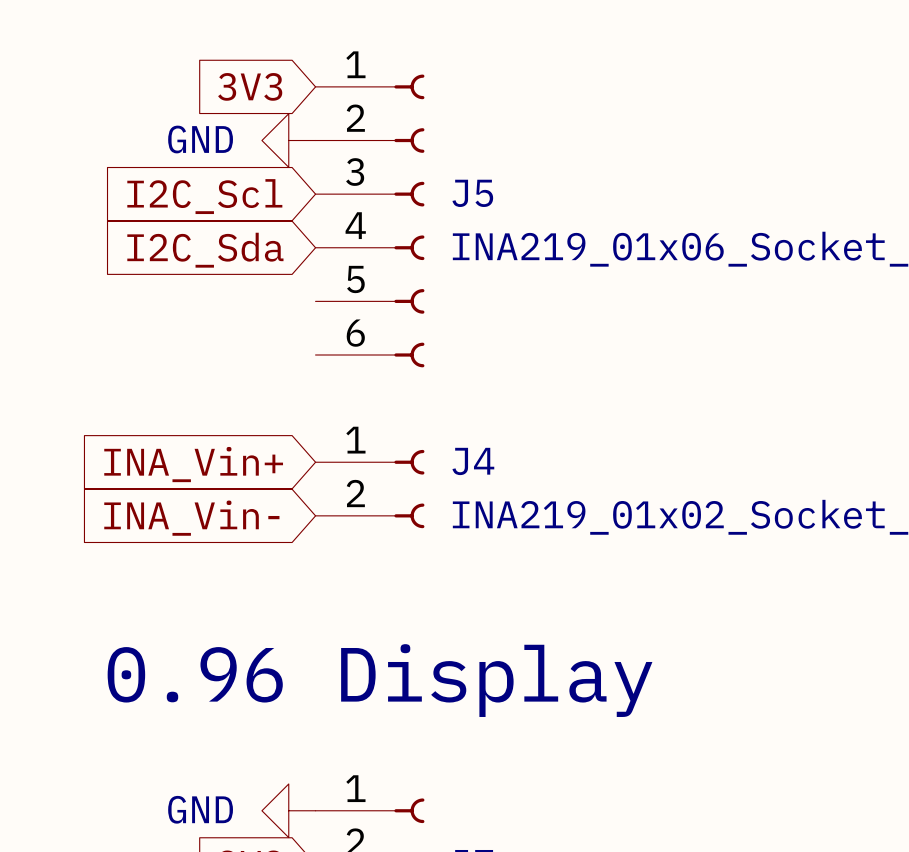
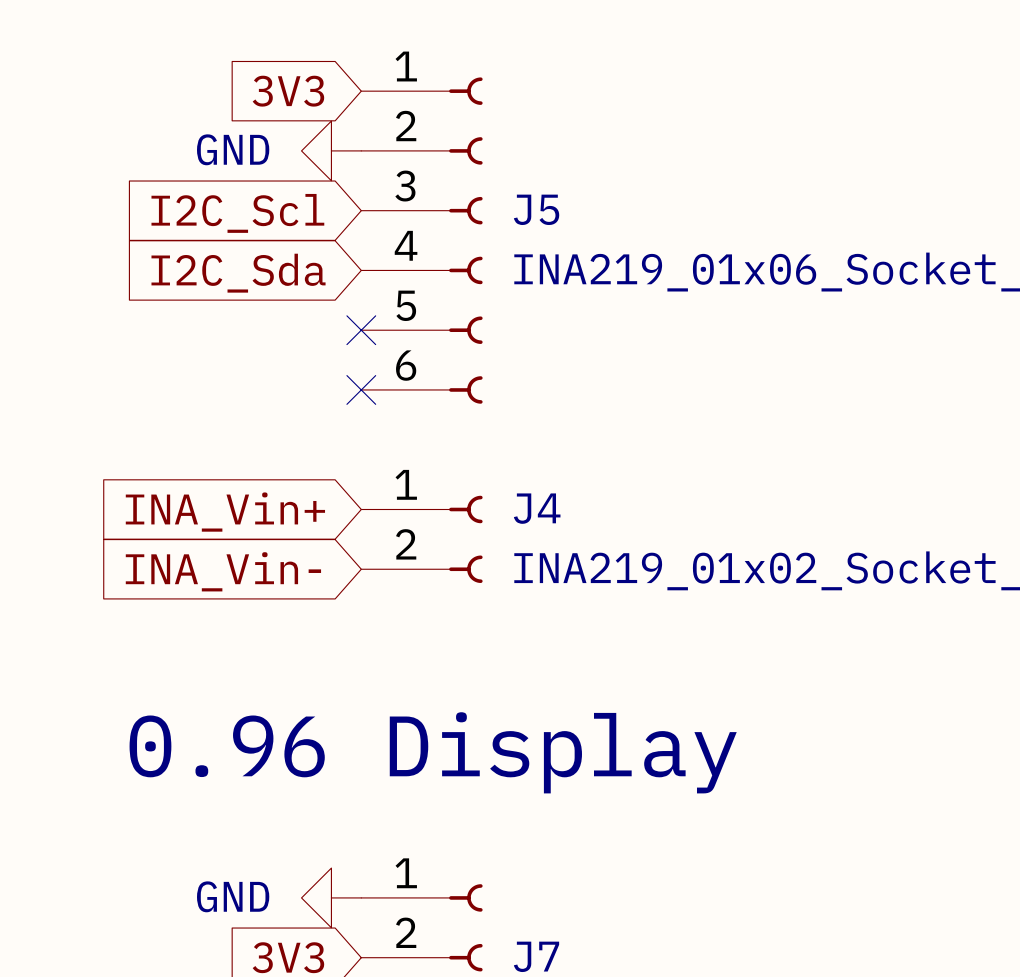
no-connect mark: none -> (361, 330)
no-connect mark: none -> (361, 389)

